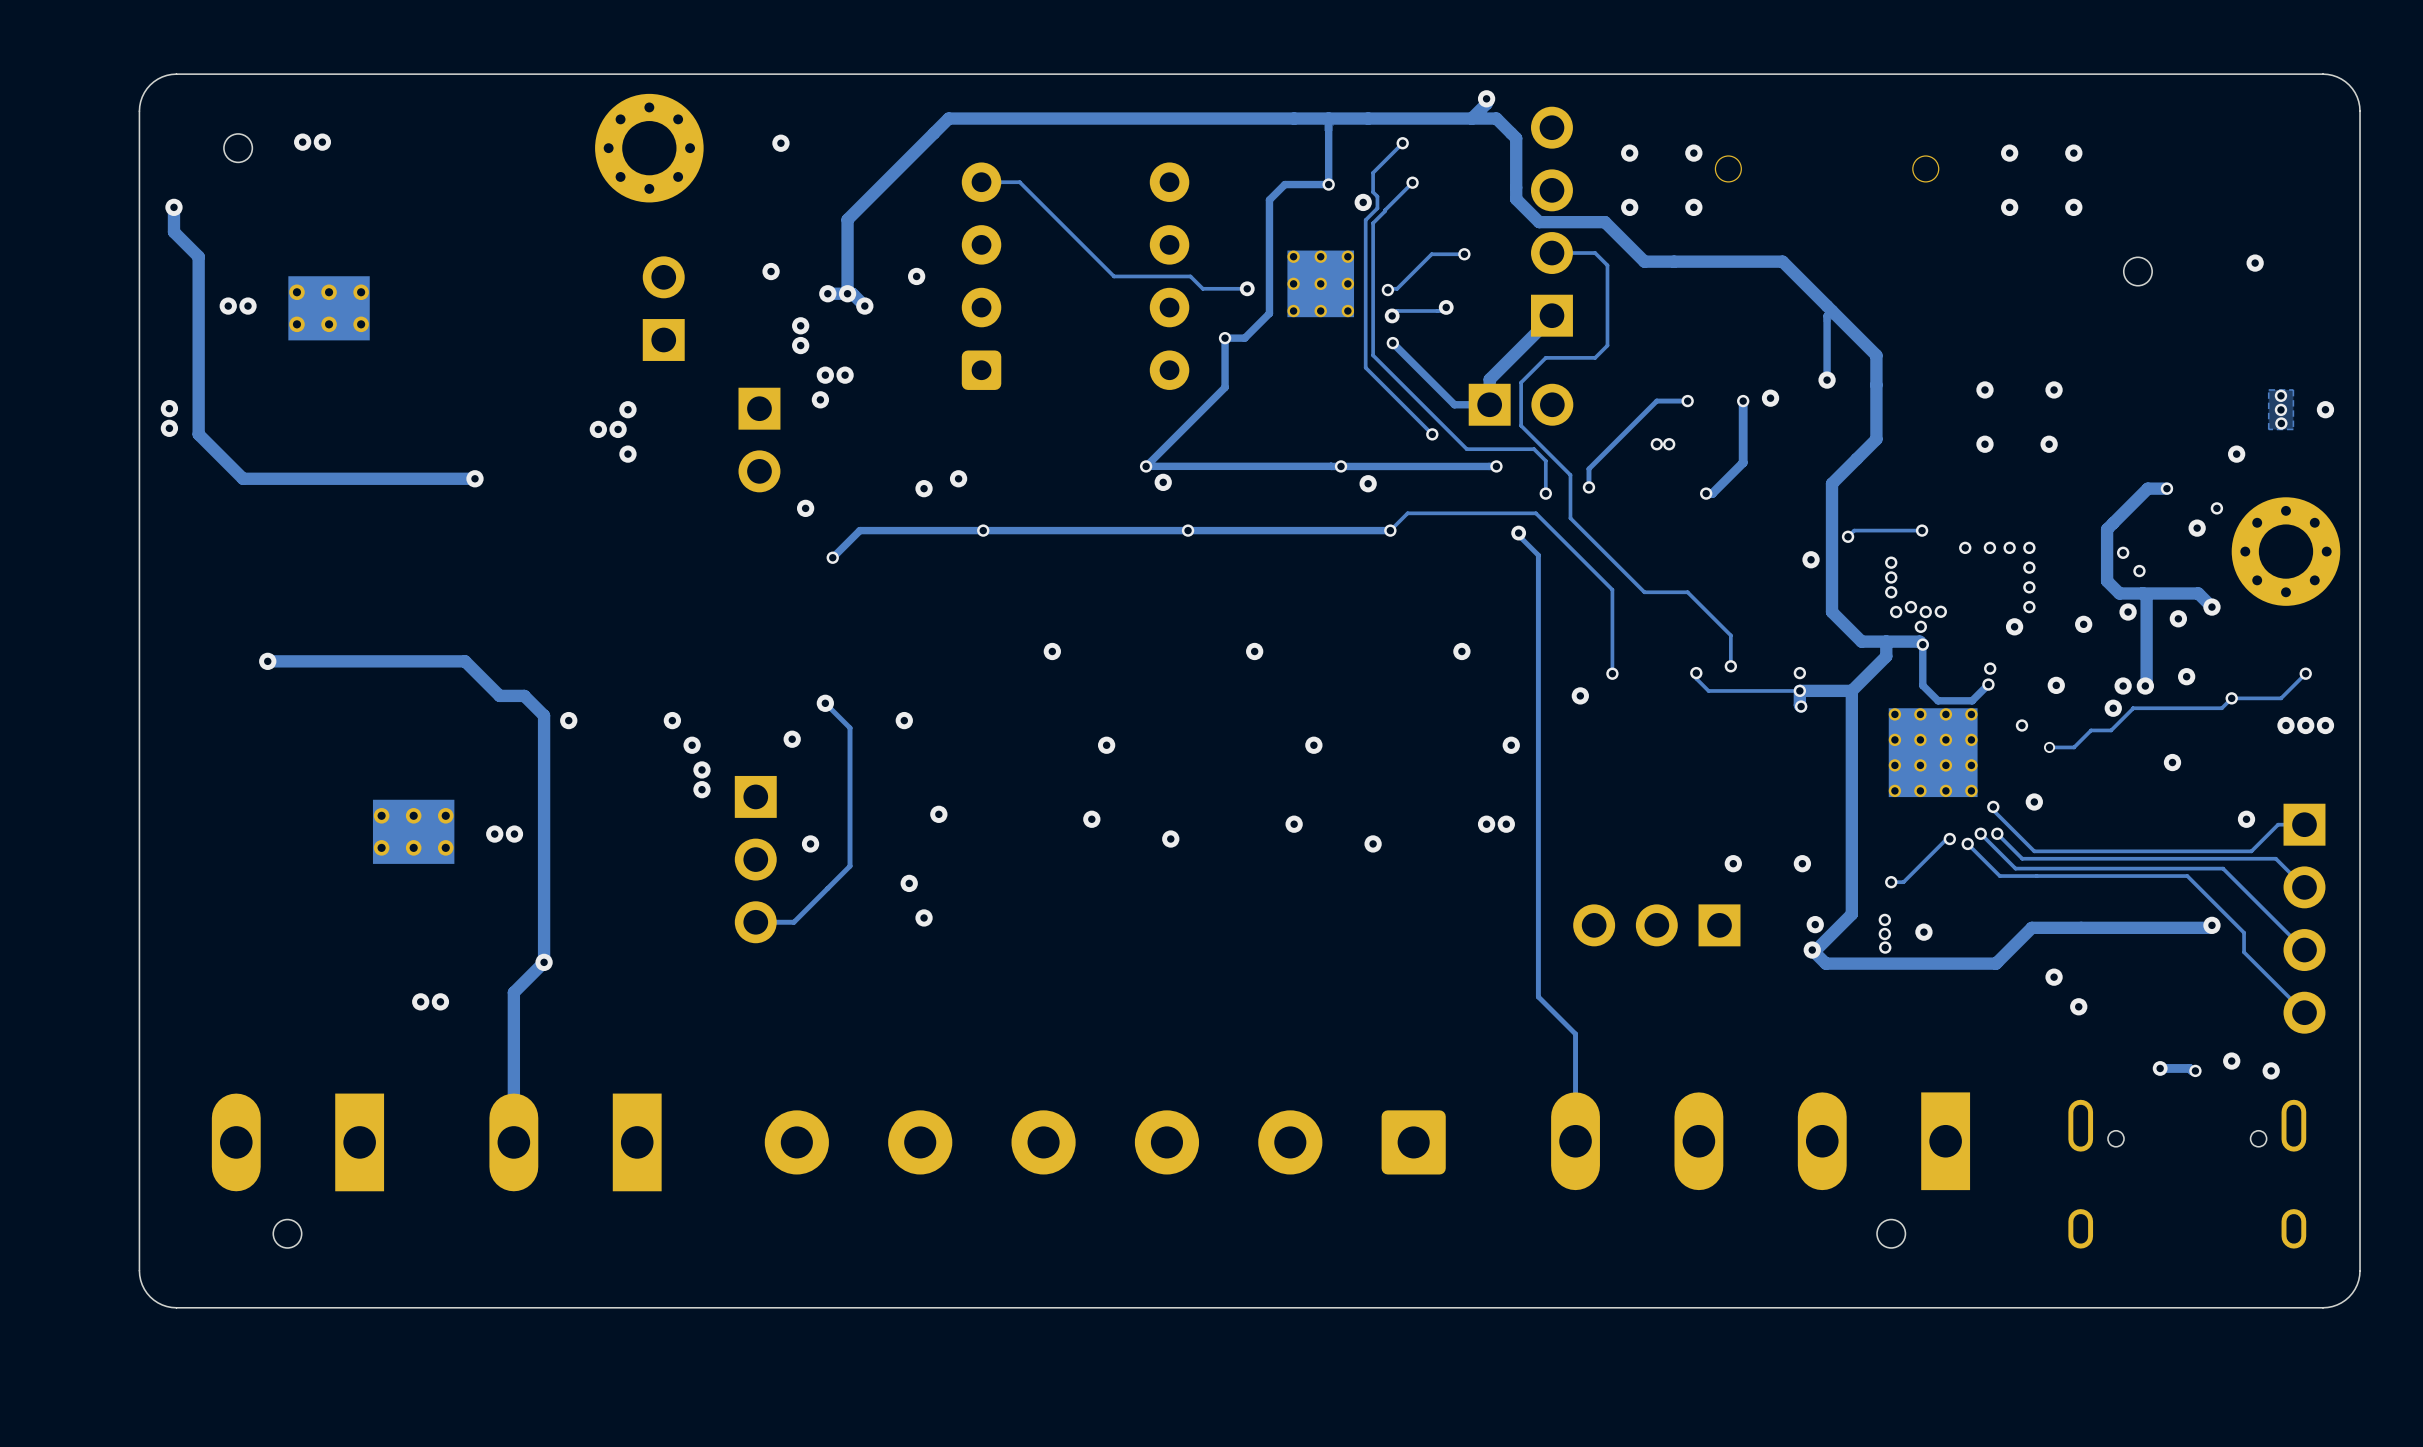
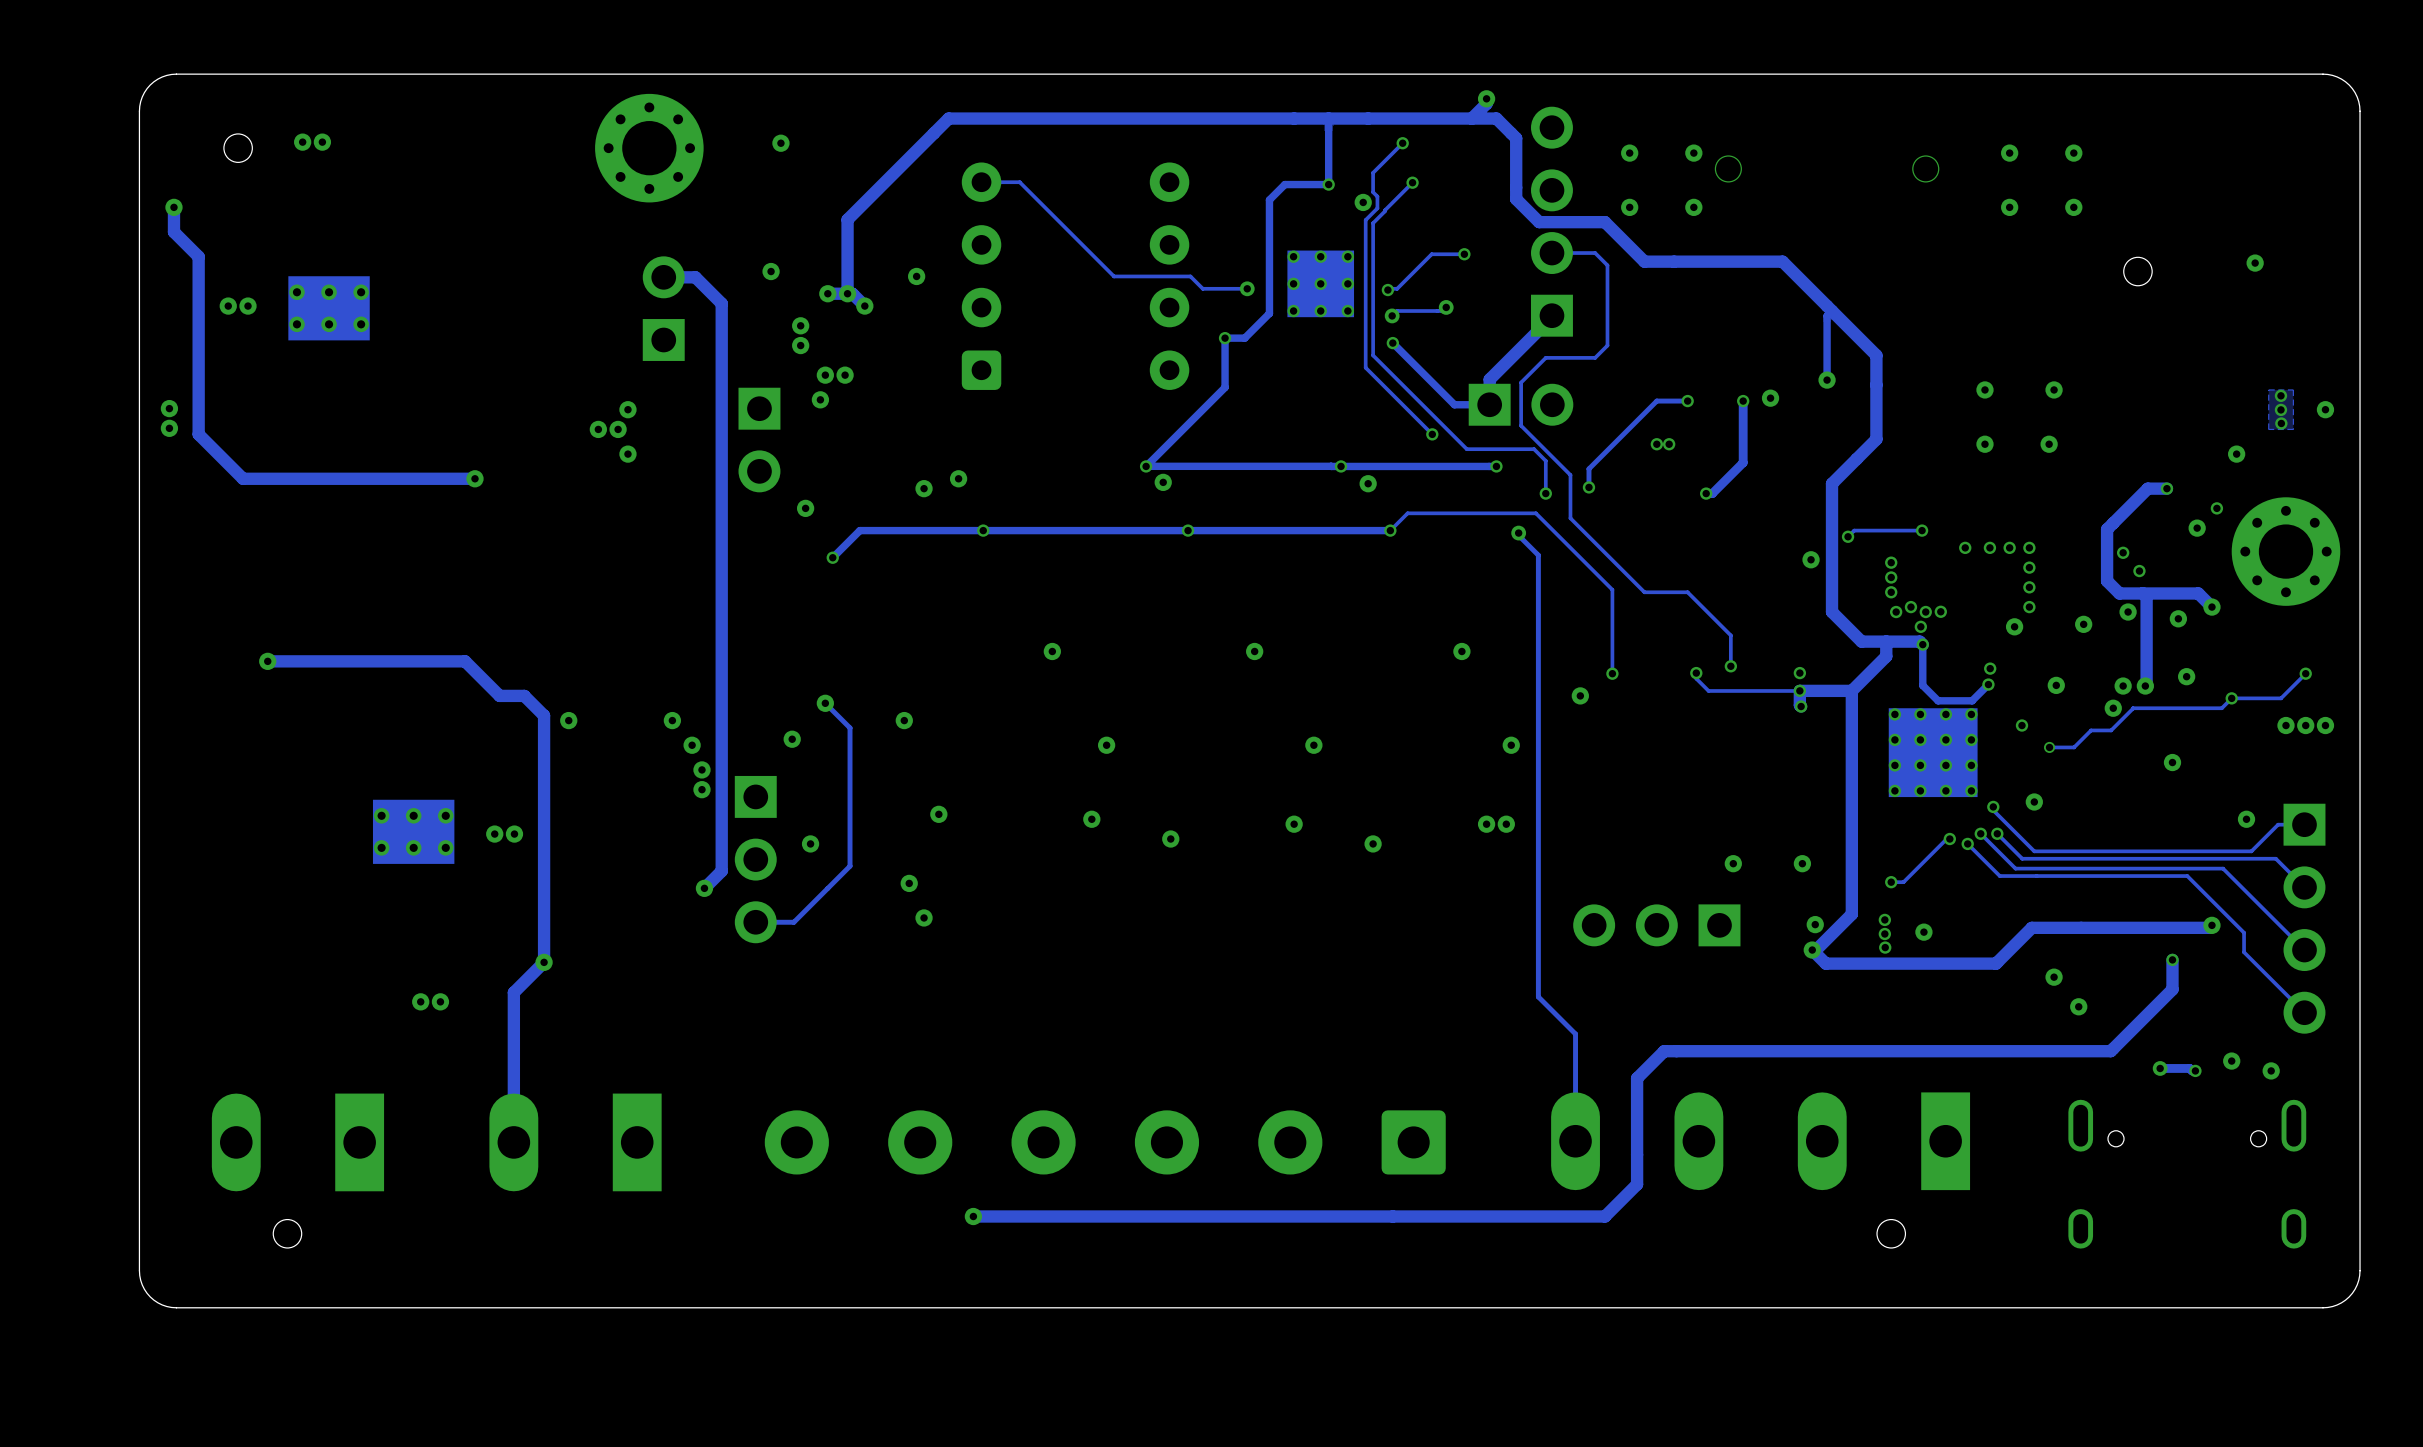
track: none -> (663, 277) (695, 277) (721, 303) (721, 871) (704, 888)
via: none -> (704, 888)
track: none -> (2172, 959) (2172, 989) (2110, 1051) (1664, 1051) (1637, 1078) (1637, 1184) (1605, 1216) (973, 1216)
via: none -> (2172, 959)
via: none -> (973, 1216)

